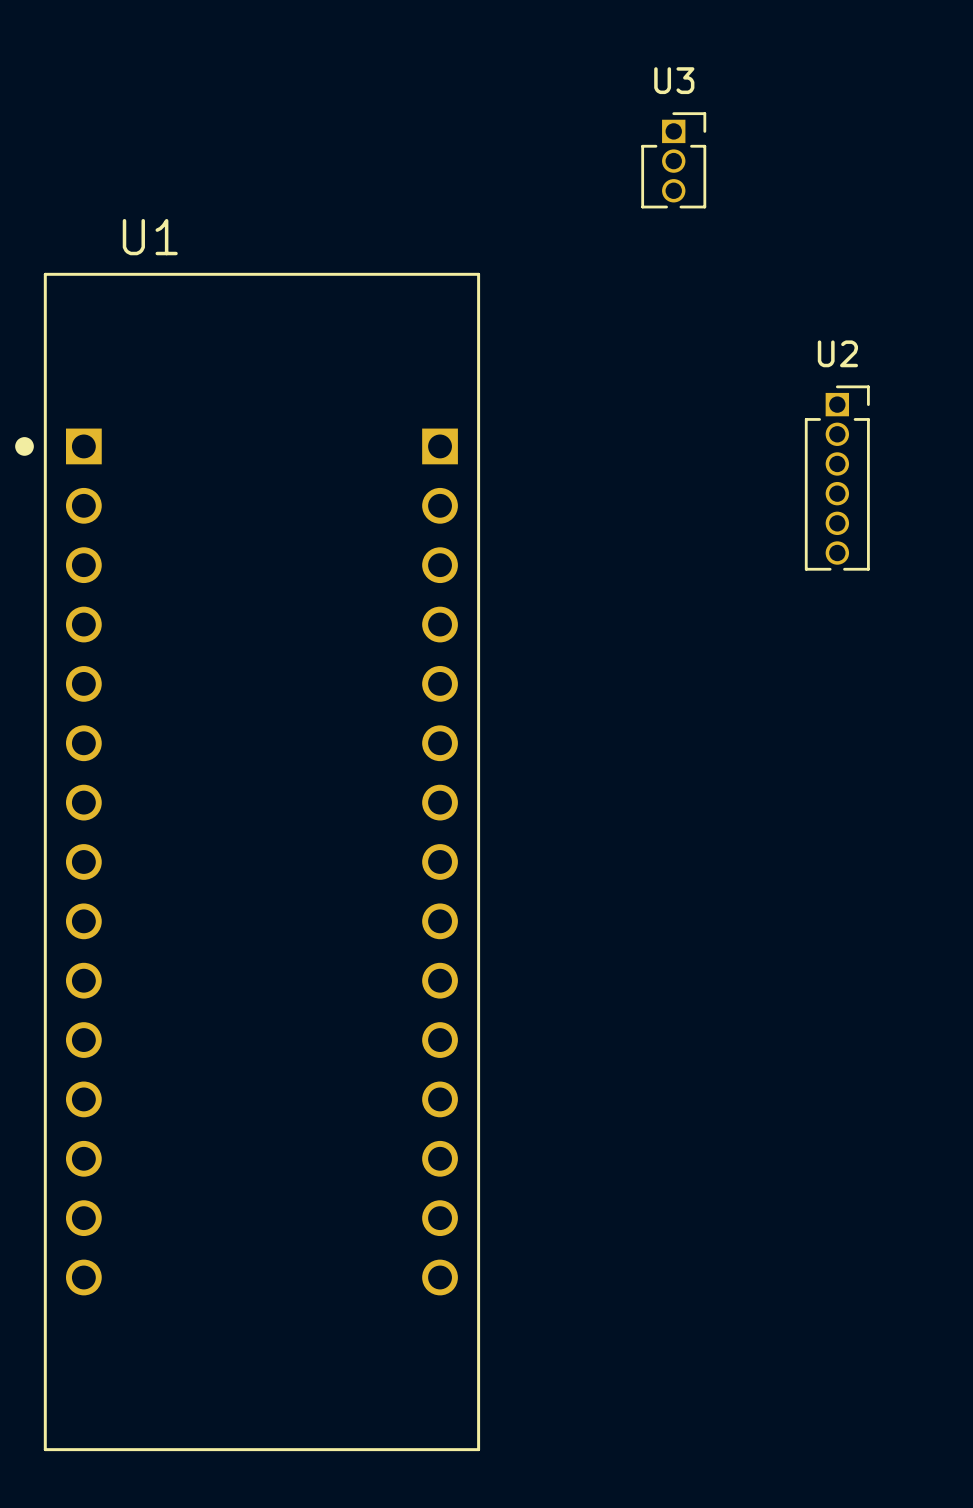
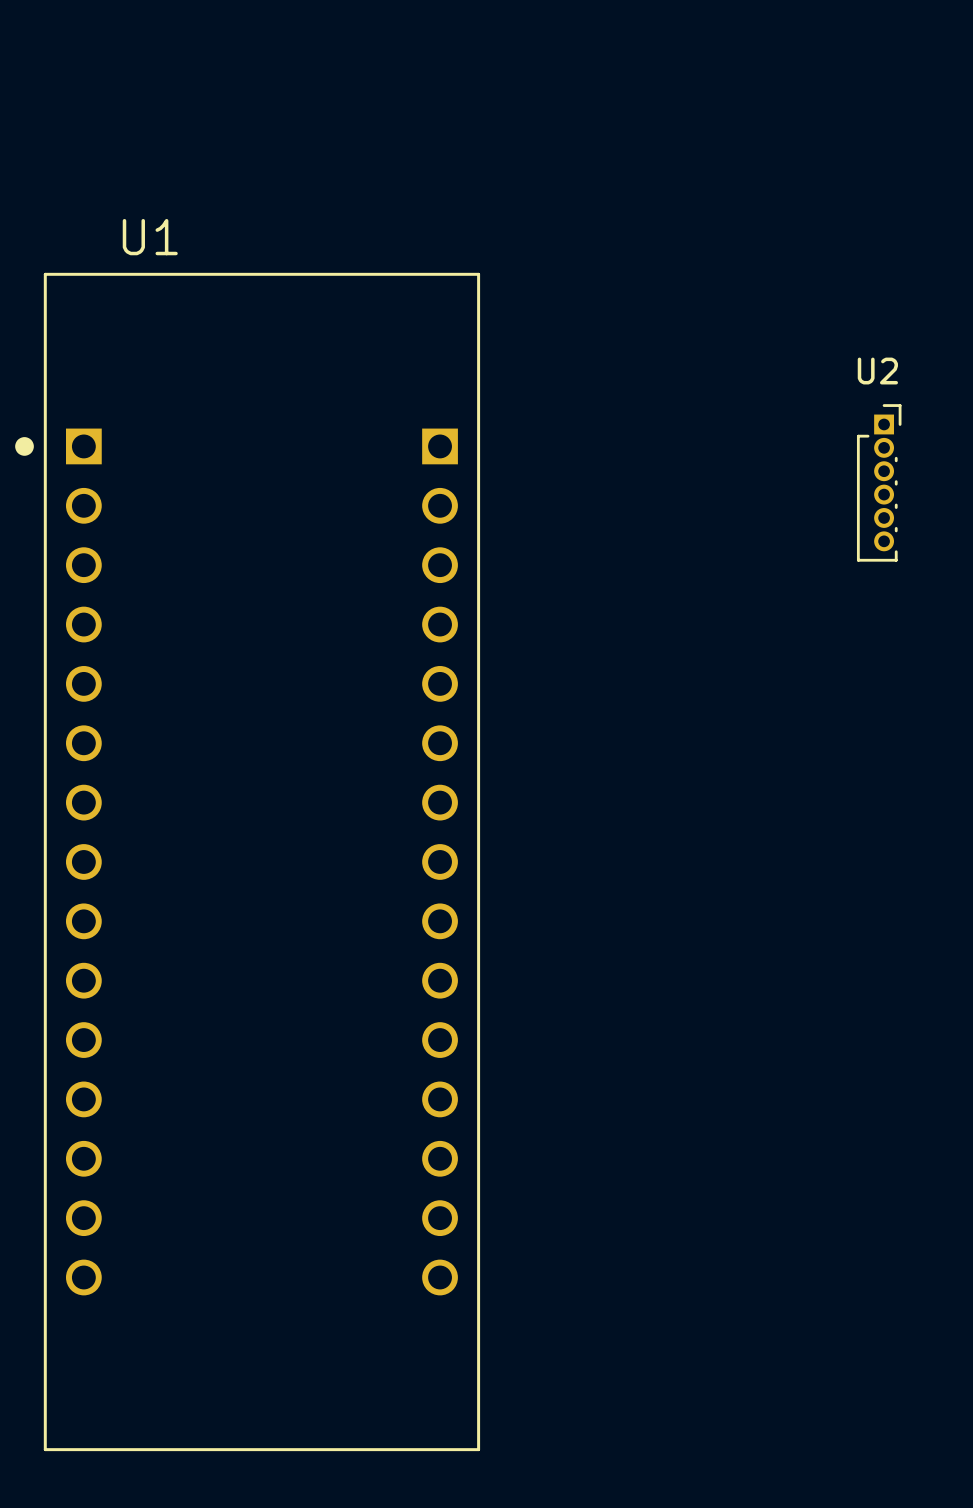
U3: (673, 160) -> none
U2 footprint: [804, 385, 870, 571] -> [856, 404, 902, 562]

